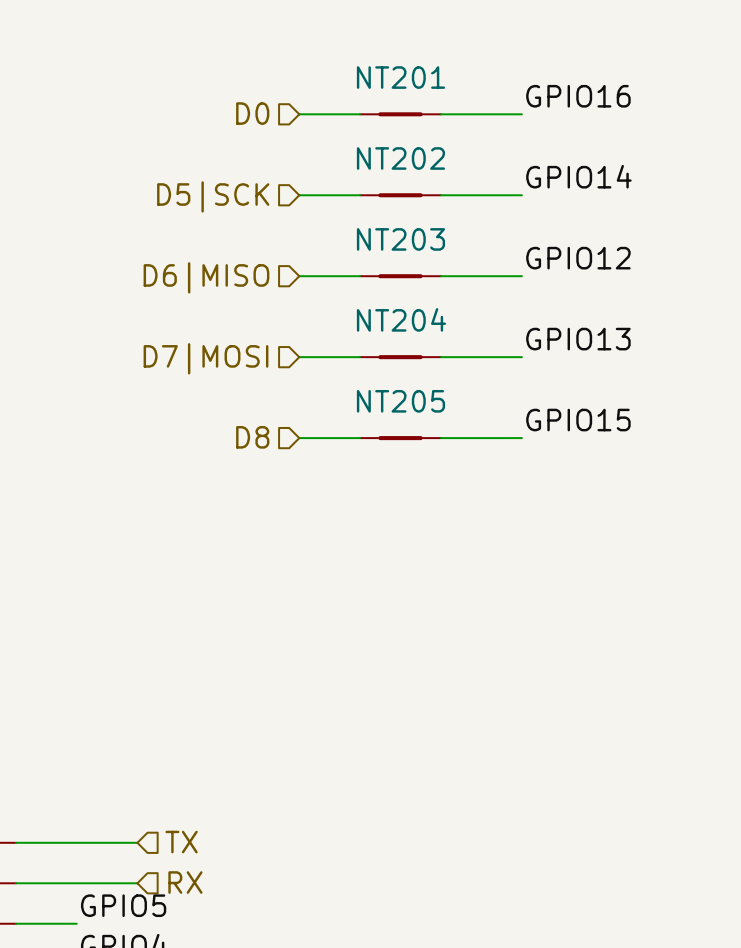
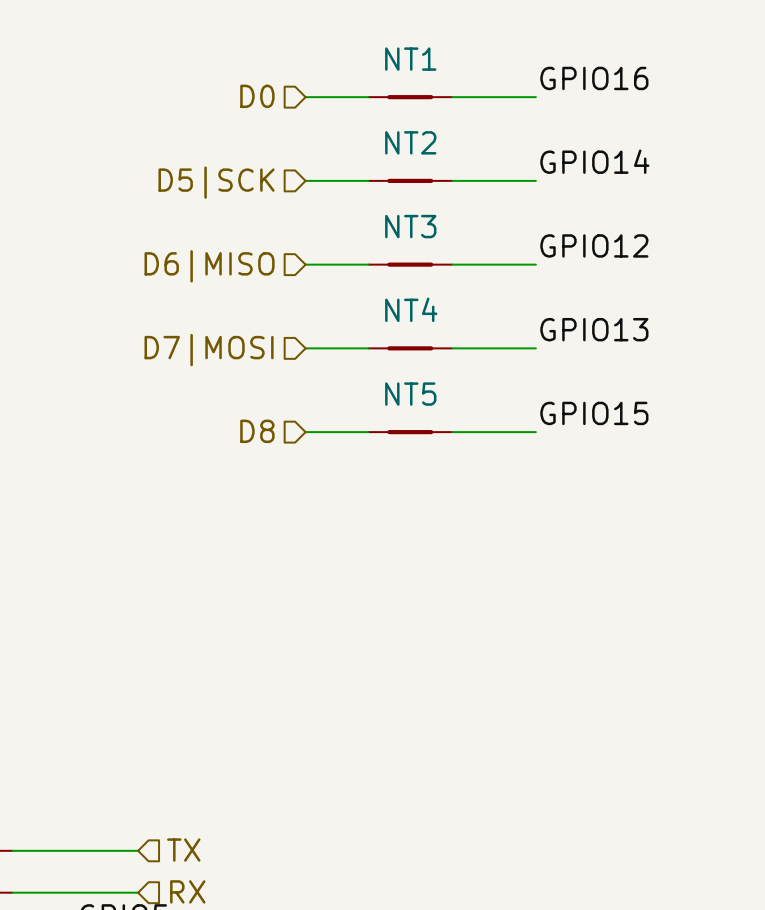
NT201 name: NT201 (400, 77) -> NT1 (410, 59)
NT202 name: NT202 (400, 158) -> NT2 (410, 142)
NT203 name: NT203 (400, 239) -> NT3 (410, 226)
NT204 name: NT204 (401, 319) -> NT4 (411, 309)
NT205 name: NT205 (400, 401) -> NT5 (410, 394)

